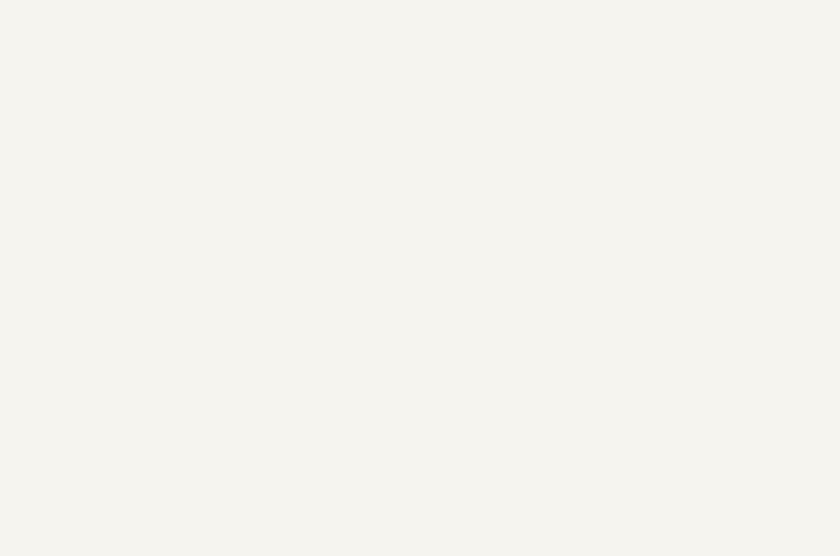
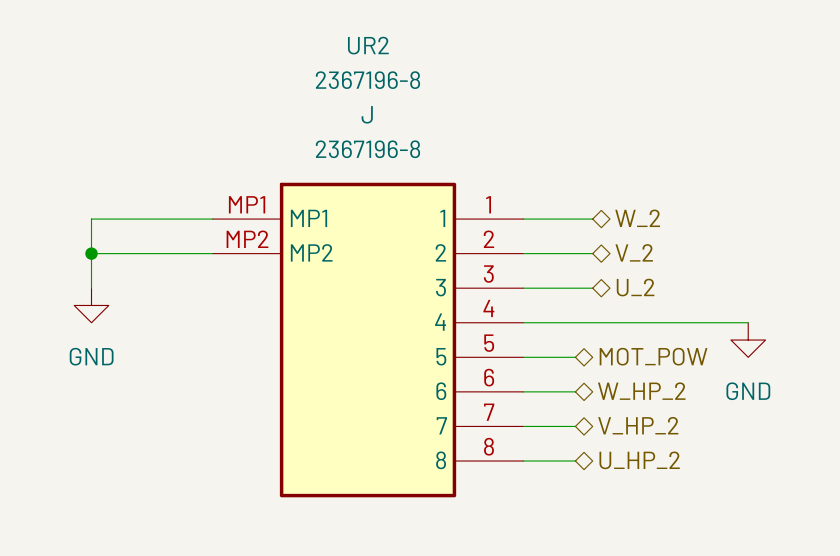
hierarchical label: none -> W_2 (637, 218)
wire: none -> (212, 219) (91, 219) (91, 288)
wire: none -> (523, 219) (592, 219)
hierarchical label: none -> V_2 (634, 252)
wire: none -> (91, 253) (212, 253)
junction: none -> (91, 253)
wire: none -> (523, 253) (592, 253)
hierarchical label: none -> U_2 (635, 287)
wire: none -> (523, 288) (592, 288)
power symbol: none -> GND (91, 305)
wire: none -> (523, 322) (748, 322)
UR2: none -> 2367196-8 (368, 340)
power symbol: none -> GND (748, 340)
hierarchical label: none -> MOT_POW (653, 356)
wire: none -> (523, 357) (575, 357)
wire: none -> (523, 391) (575, 391)
hierarchical label: none -> W_HP_2 (641, 391)
hierarchical label: none -> V_HP_2 (638, 425)
wire: none -> (523, 426) (575, 426)
hierarchical label: none -> U_HP_2 (639, 460)
wire: none -> (523, 461) (575, 461)

